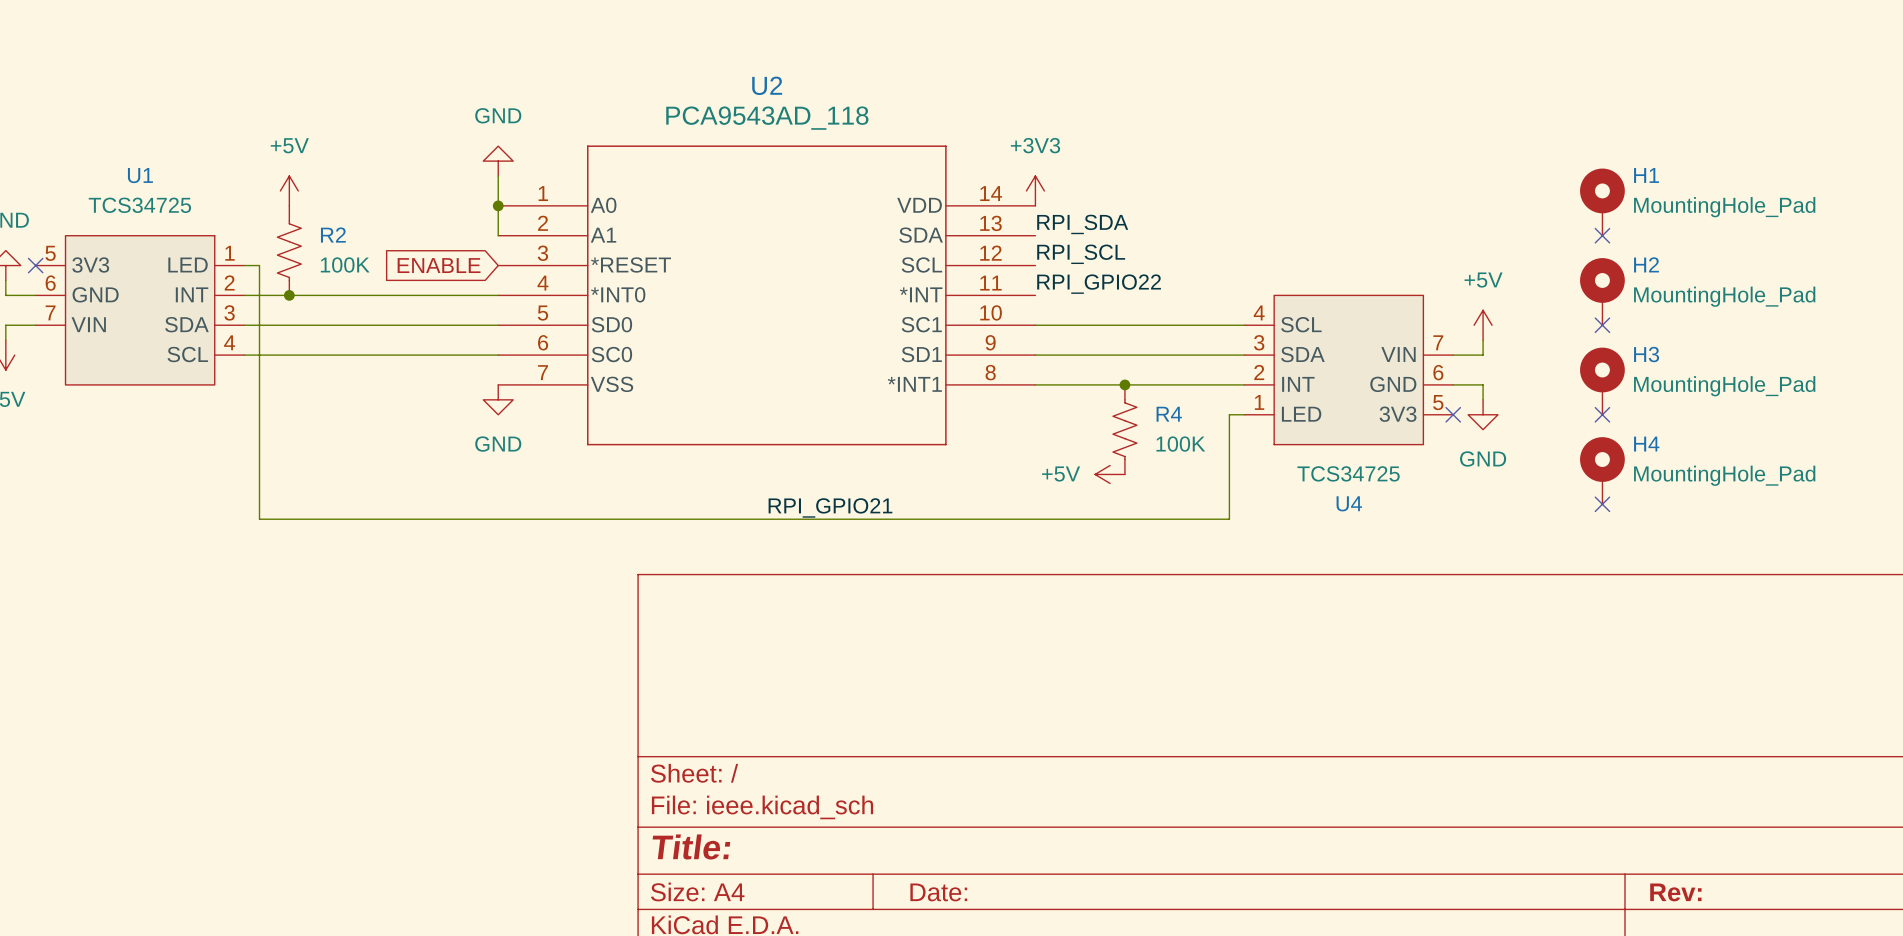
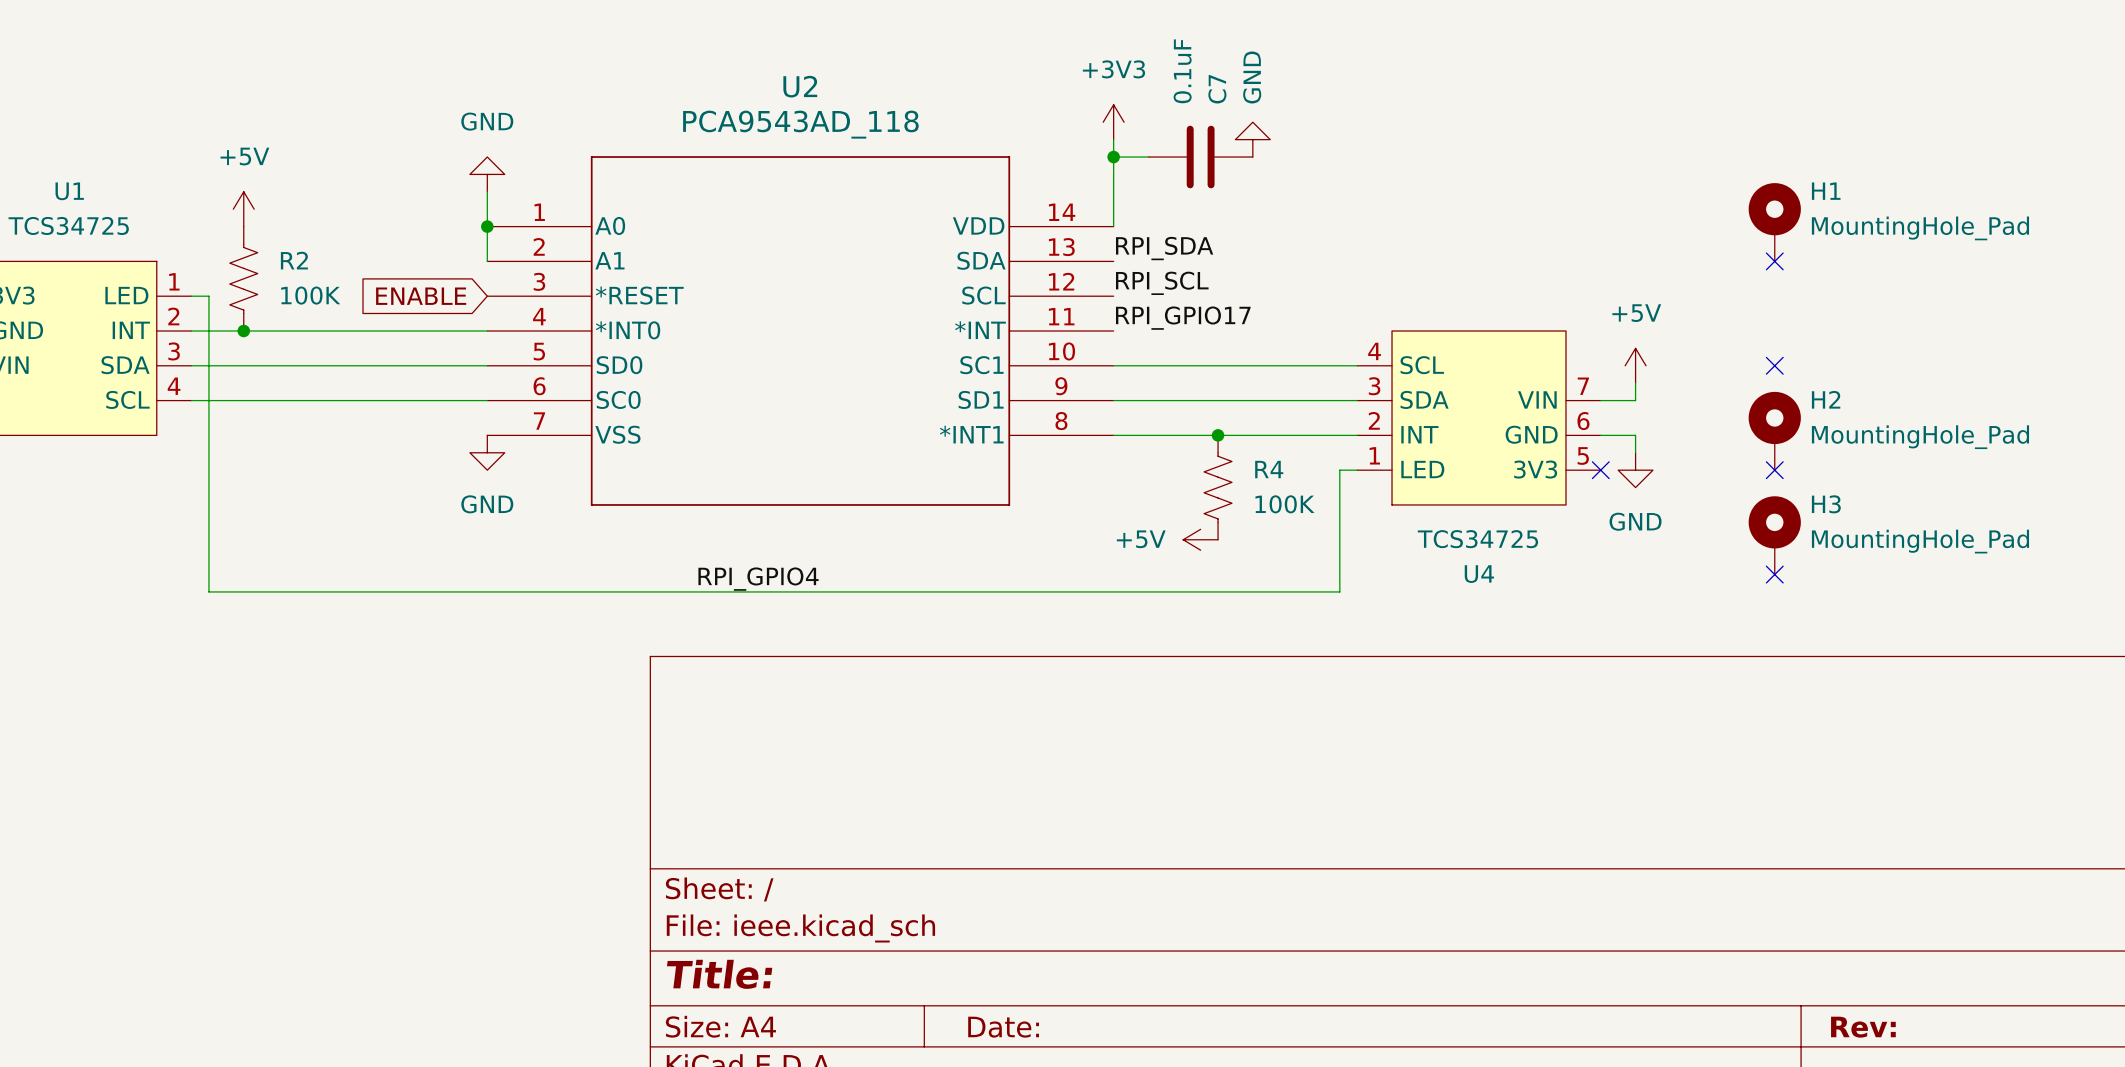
wire: none -> (1113, 139) (1113, 226)
power symbol: none -> GND (1252, 139)
wire: none -> (1113, 157) (1148, 157)
junction: none -> (1113, 157)
C7: none -> 0.1uF (1200, 157)
power symbol position: +3V3 (1035, 190) -> +3V3 (1113, 122)
label: RPI_GPIO22 (1099, 284) -> RPI_GPIO17 (1183, 318)
H2: MountingHole_Pad (1602, 291) -> none
H3 name: H3 (1646, 354) -> H2 (1826, 399)
H4 name: H4 (1646, 444) -> H3 (1826, 504)
label: RPI_GPIO21 (830, 507) -> RPI_GPIO4 (758, 579)

